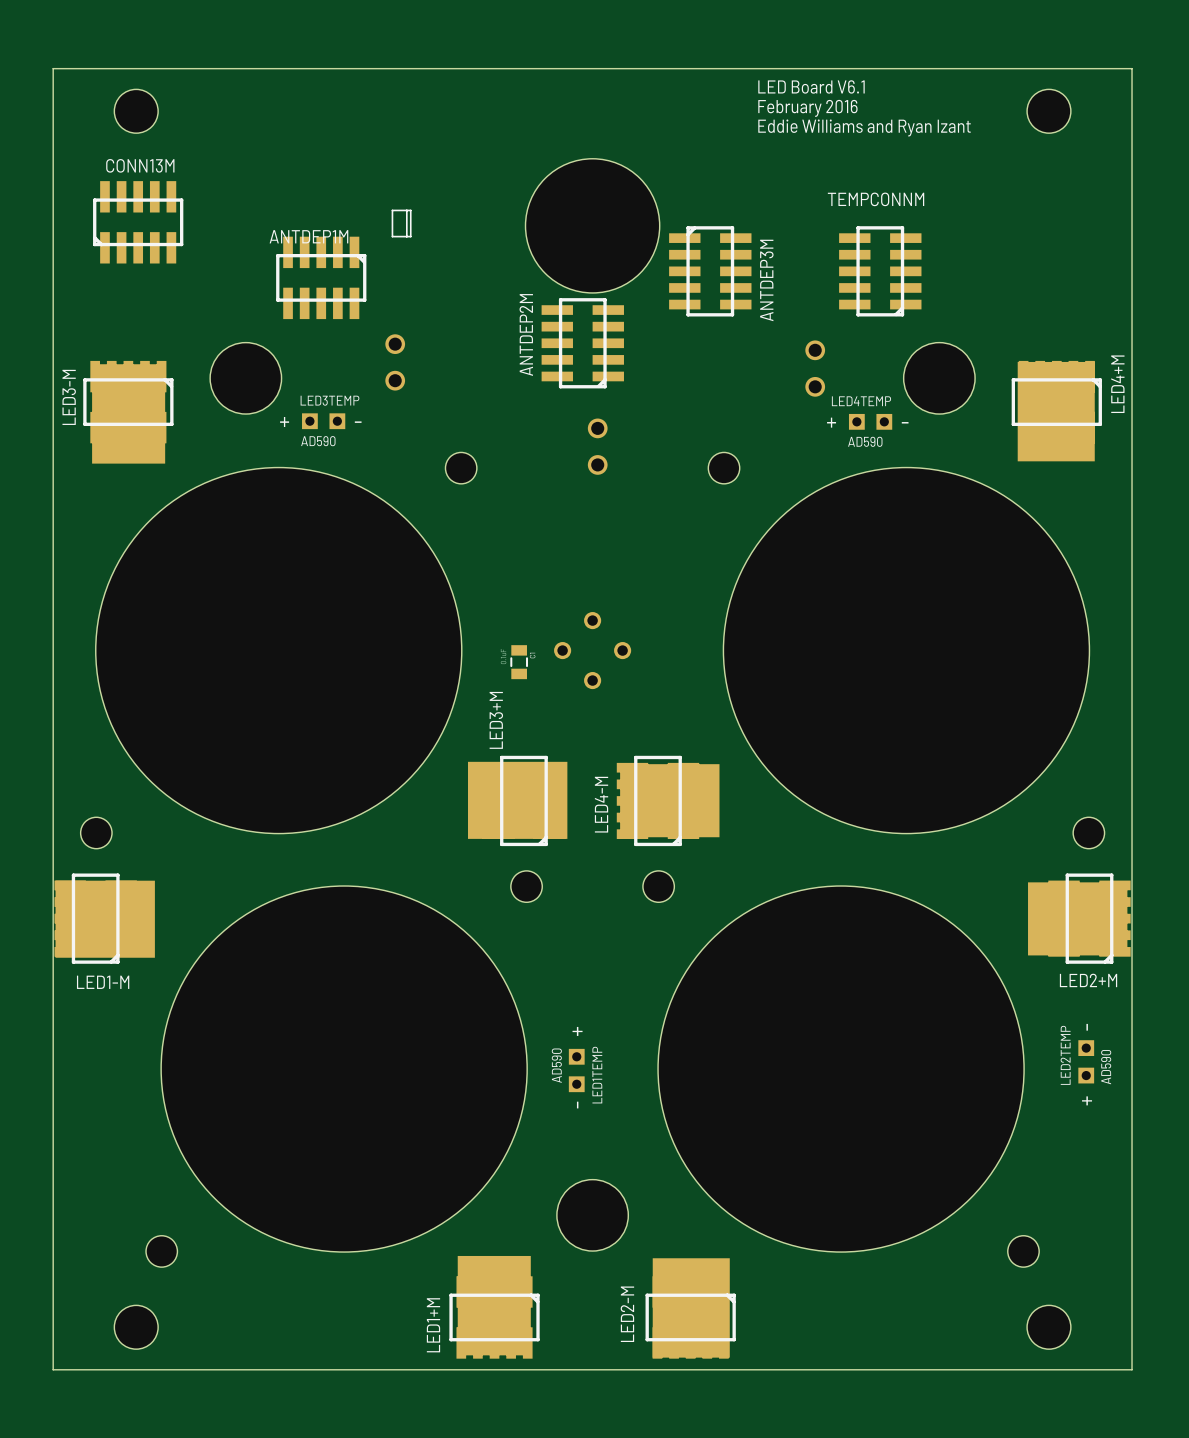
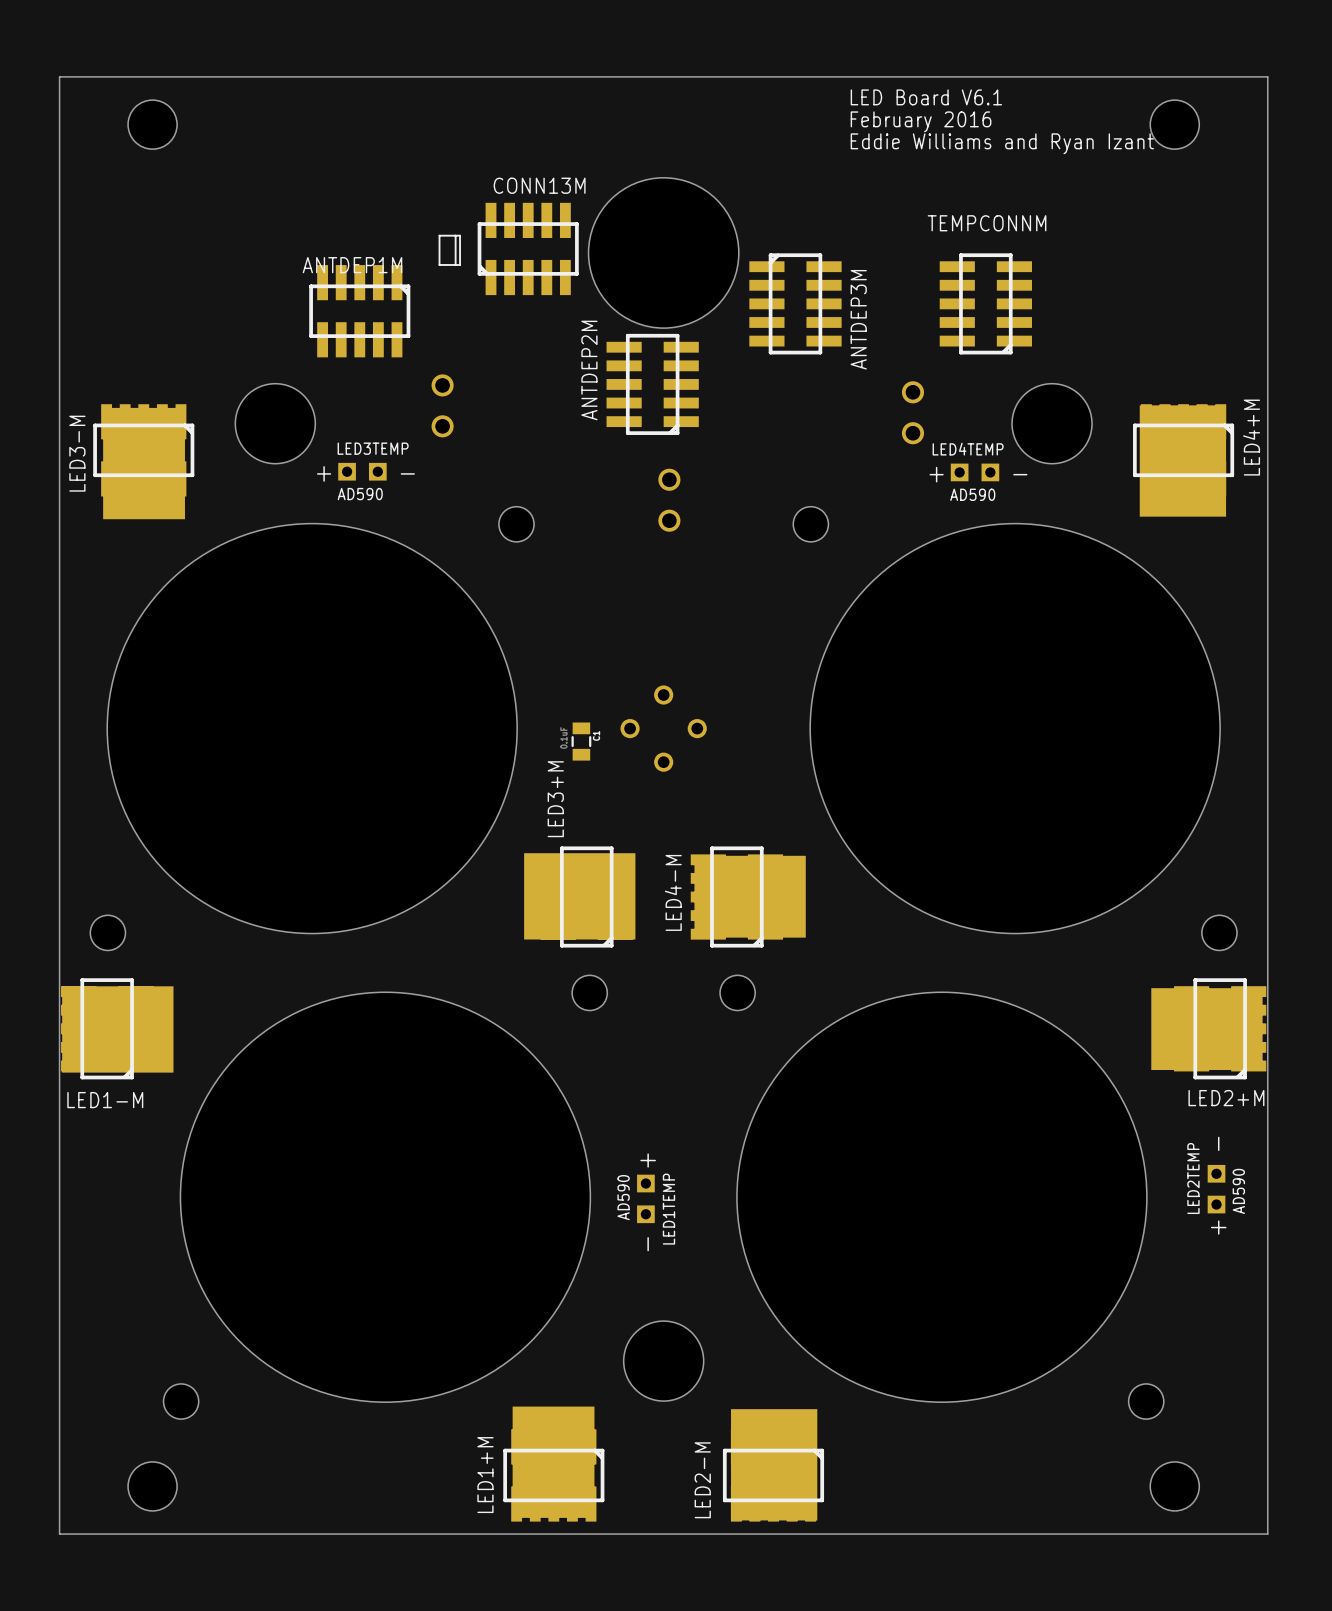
CONN13M position: (138, 222) -> (528, 248)

